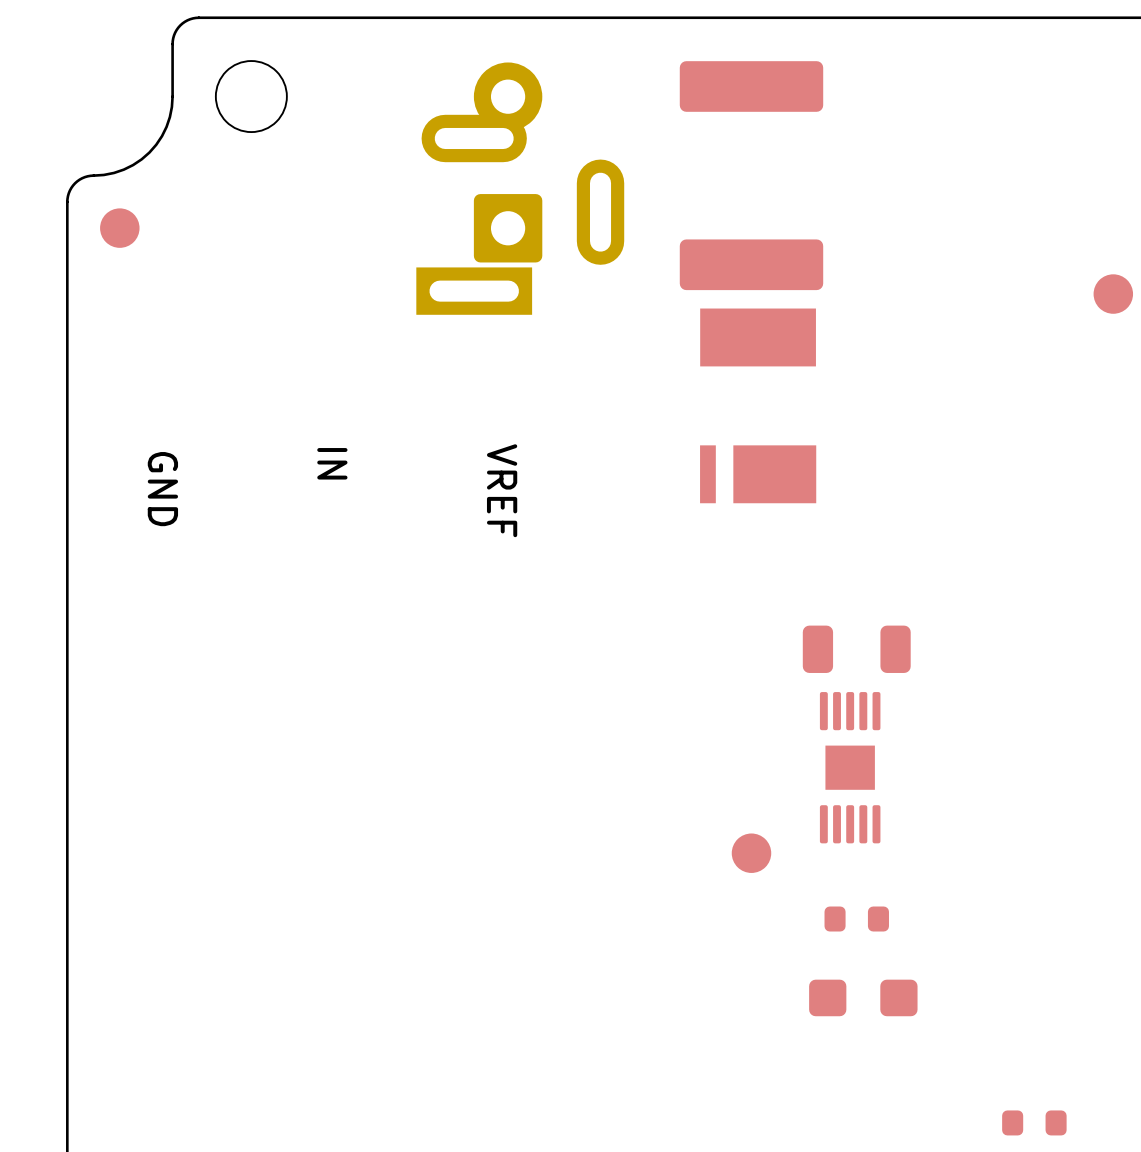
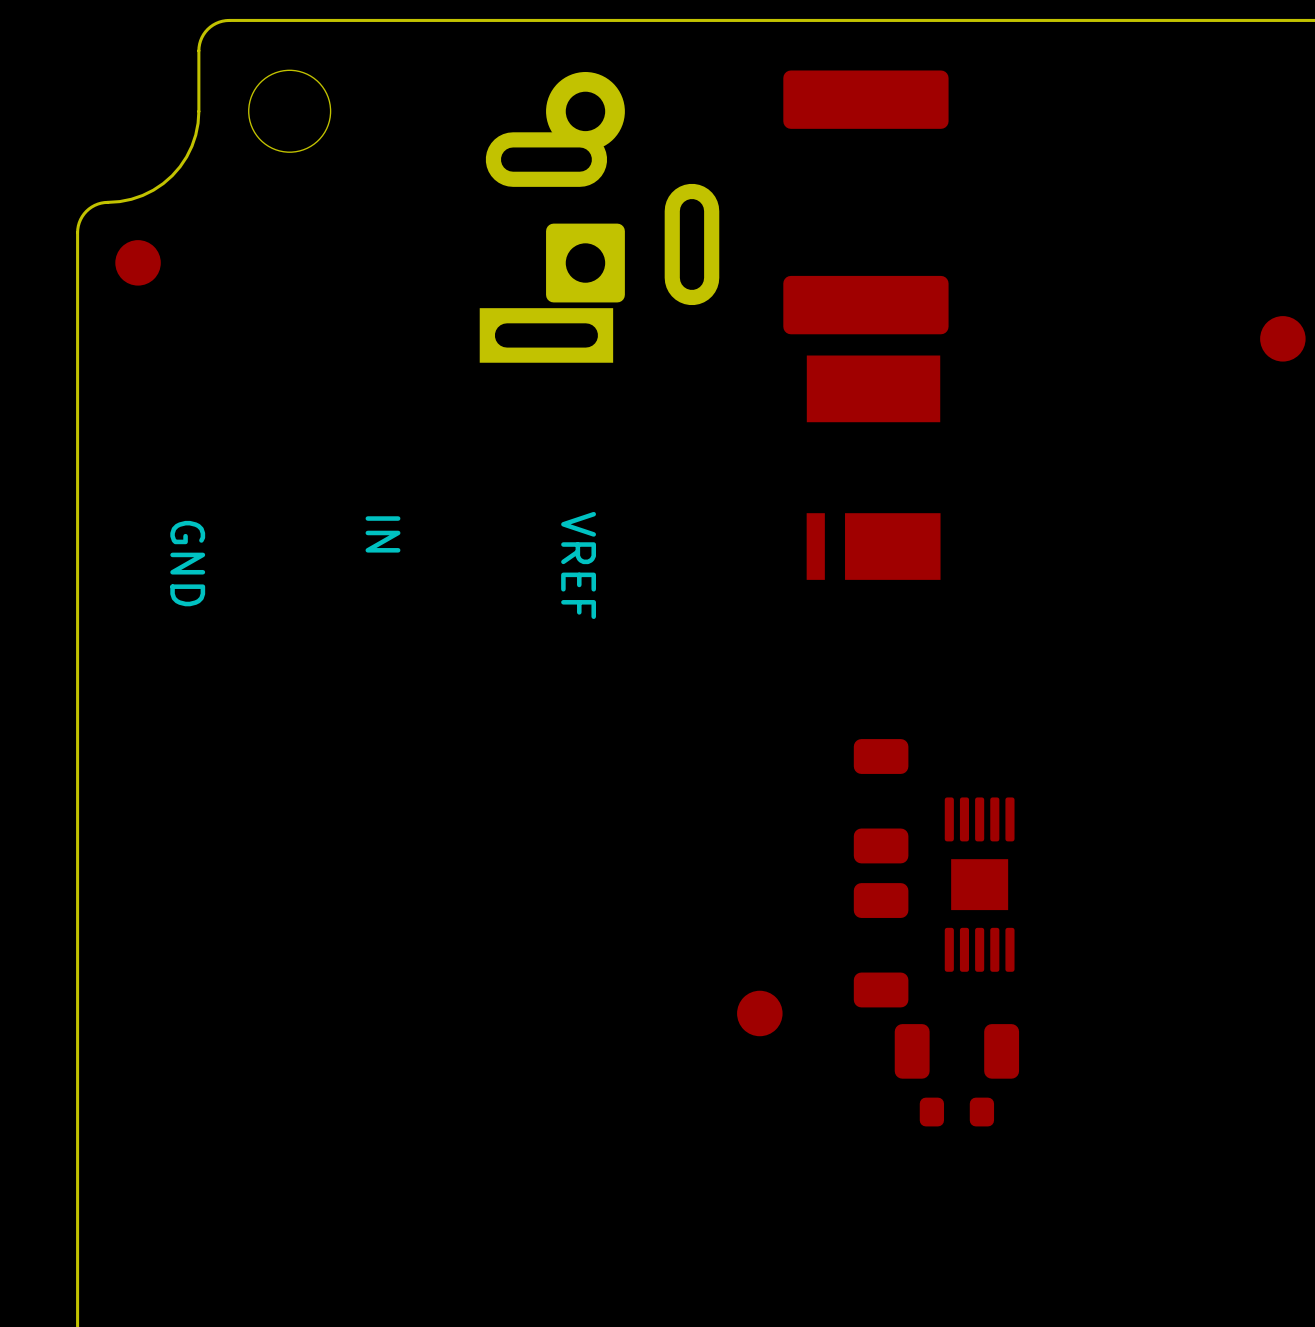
part: (856, 649) -> none
part: none -> (881, 801)
part: none -> (881, 945)
part position: (751, 853) -> (759, 1013)
part: none -> (956, 1051)
part position: (856, 919) -> (956, 1112)
part: (863, 997) -> none
part: (1034, 1122) -> none

